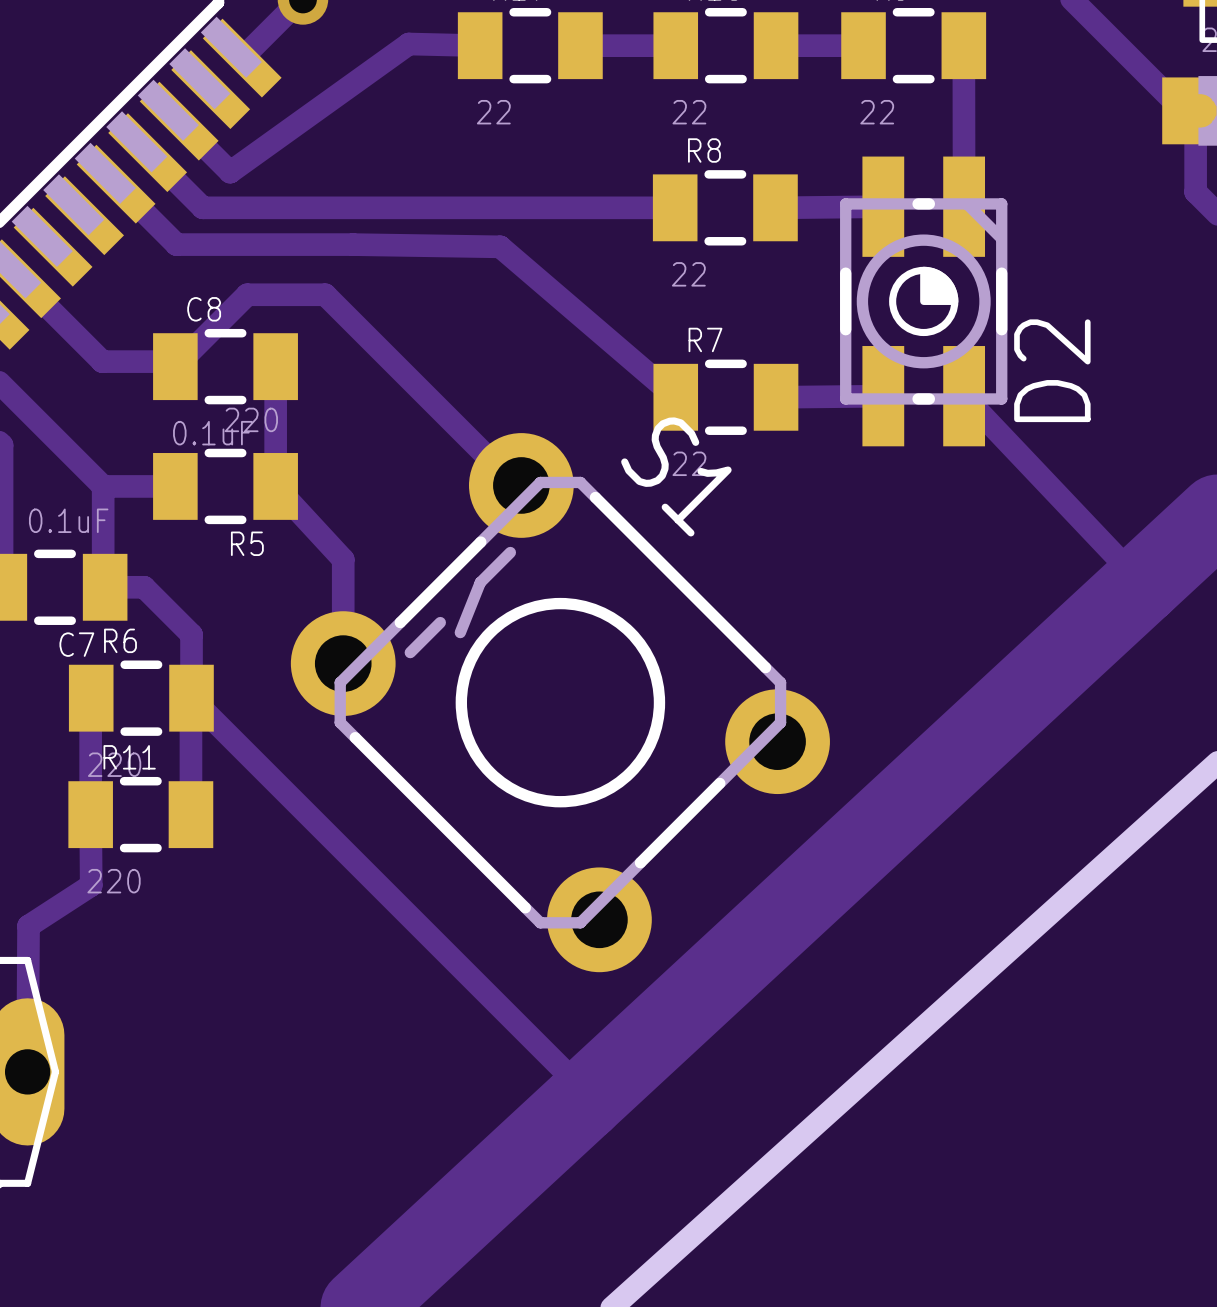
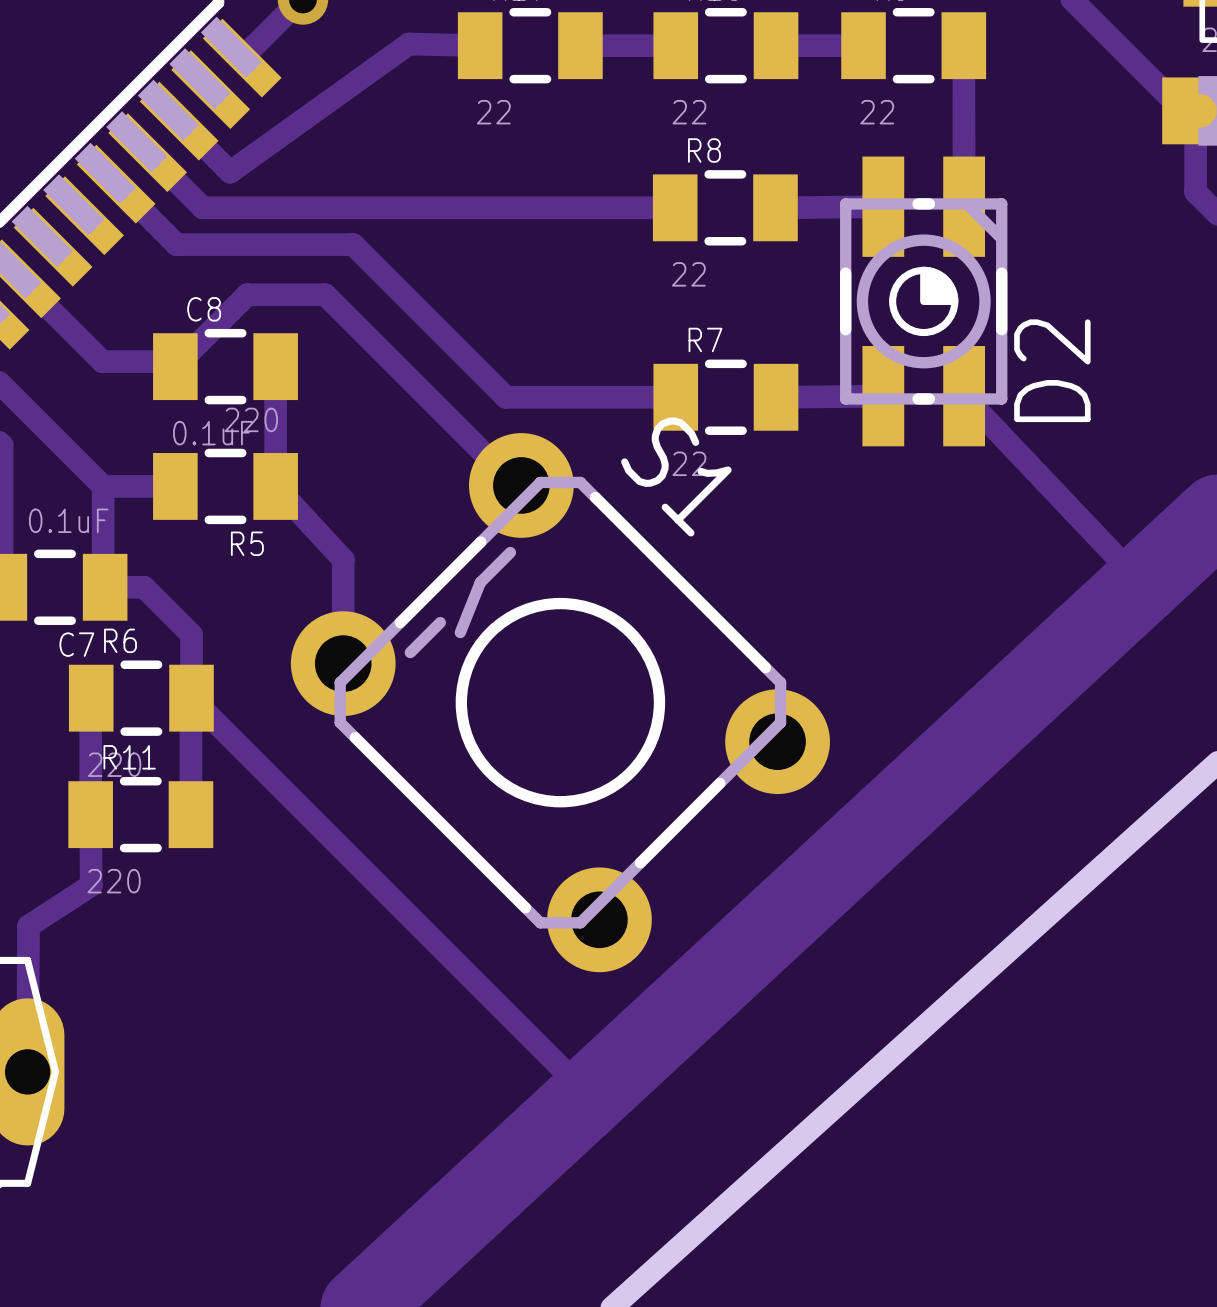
track: (353, 244) (500, 246) (675, 397) -> (353, 244) (505, 397) (675, 397)

